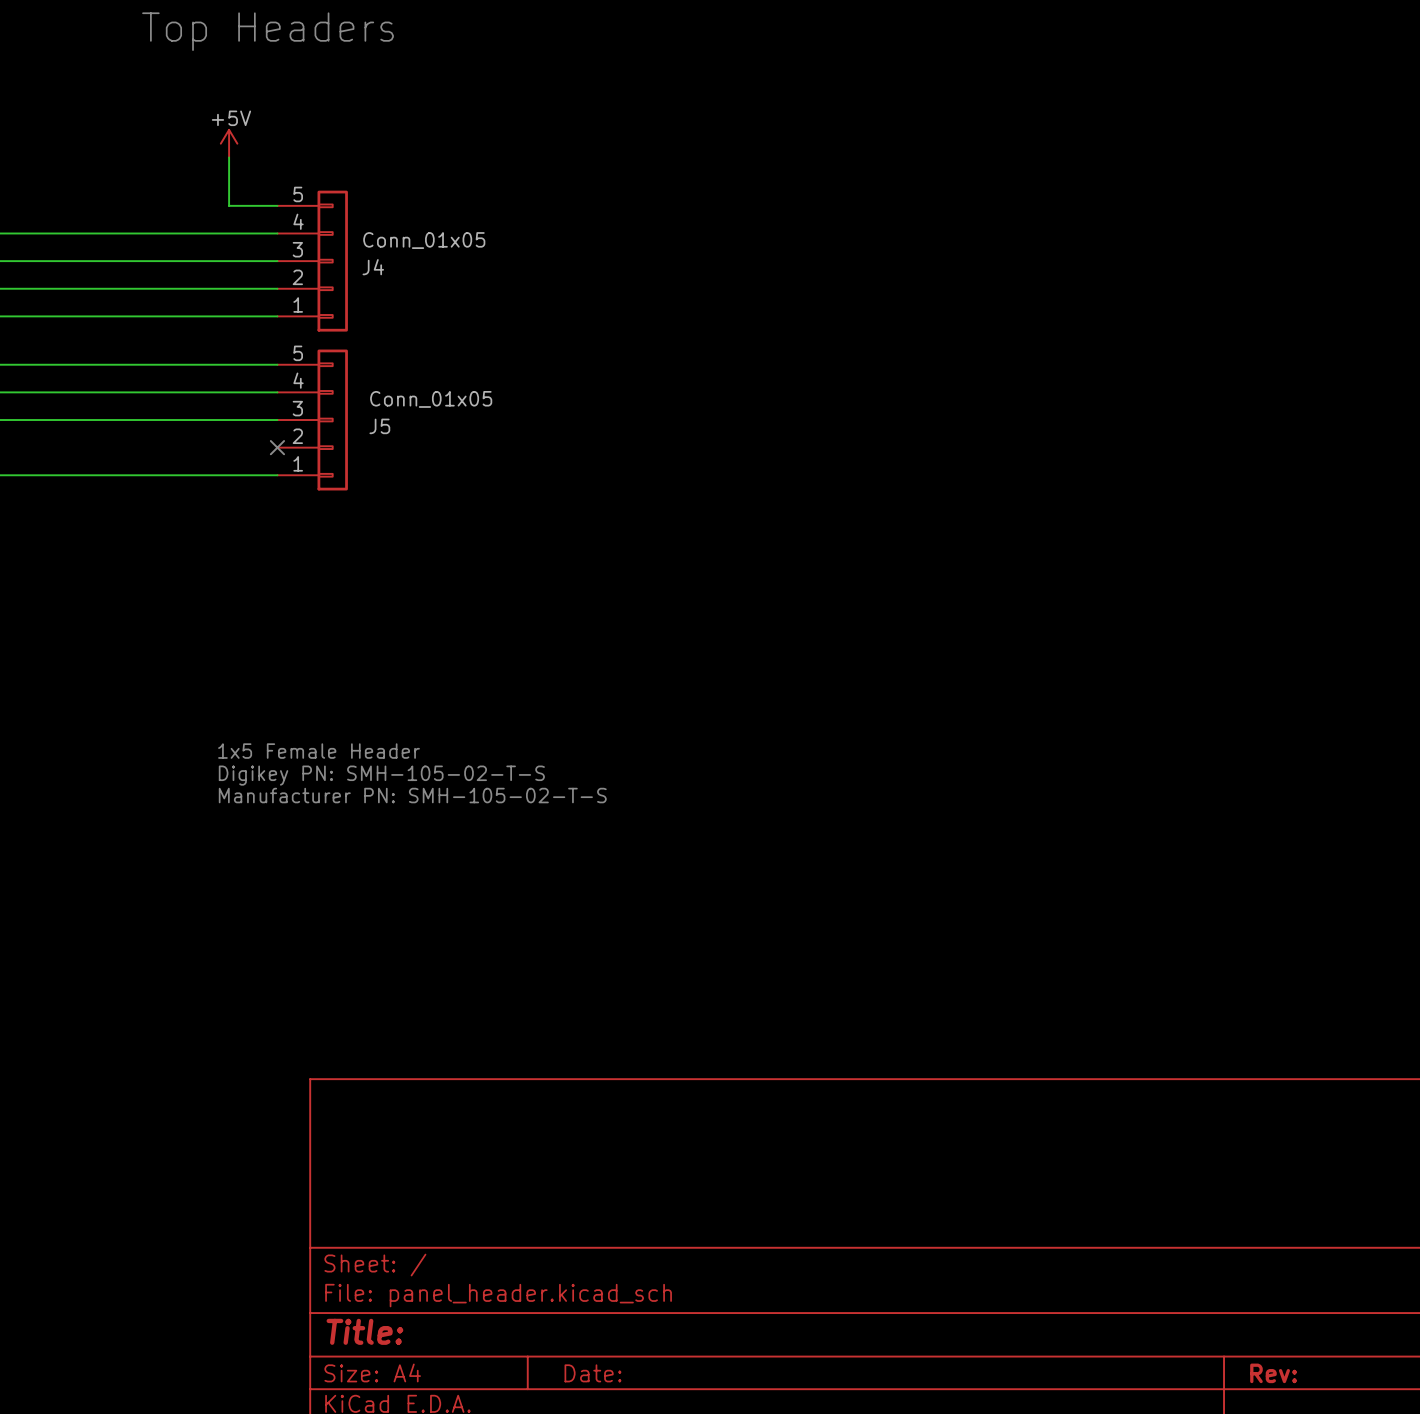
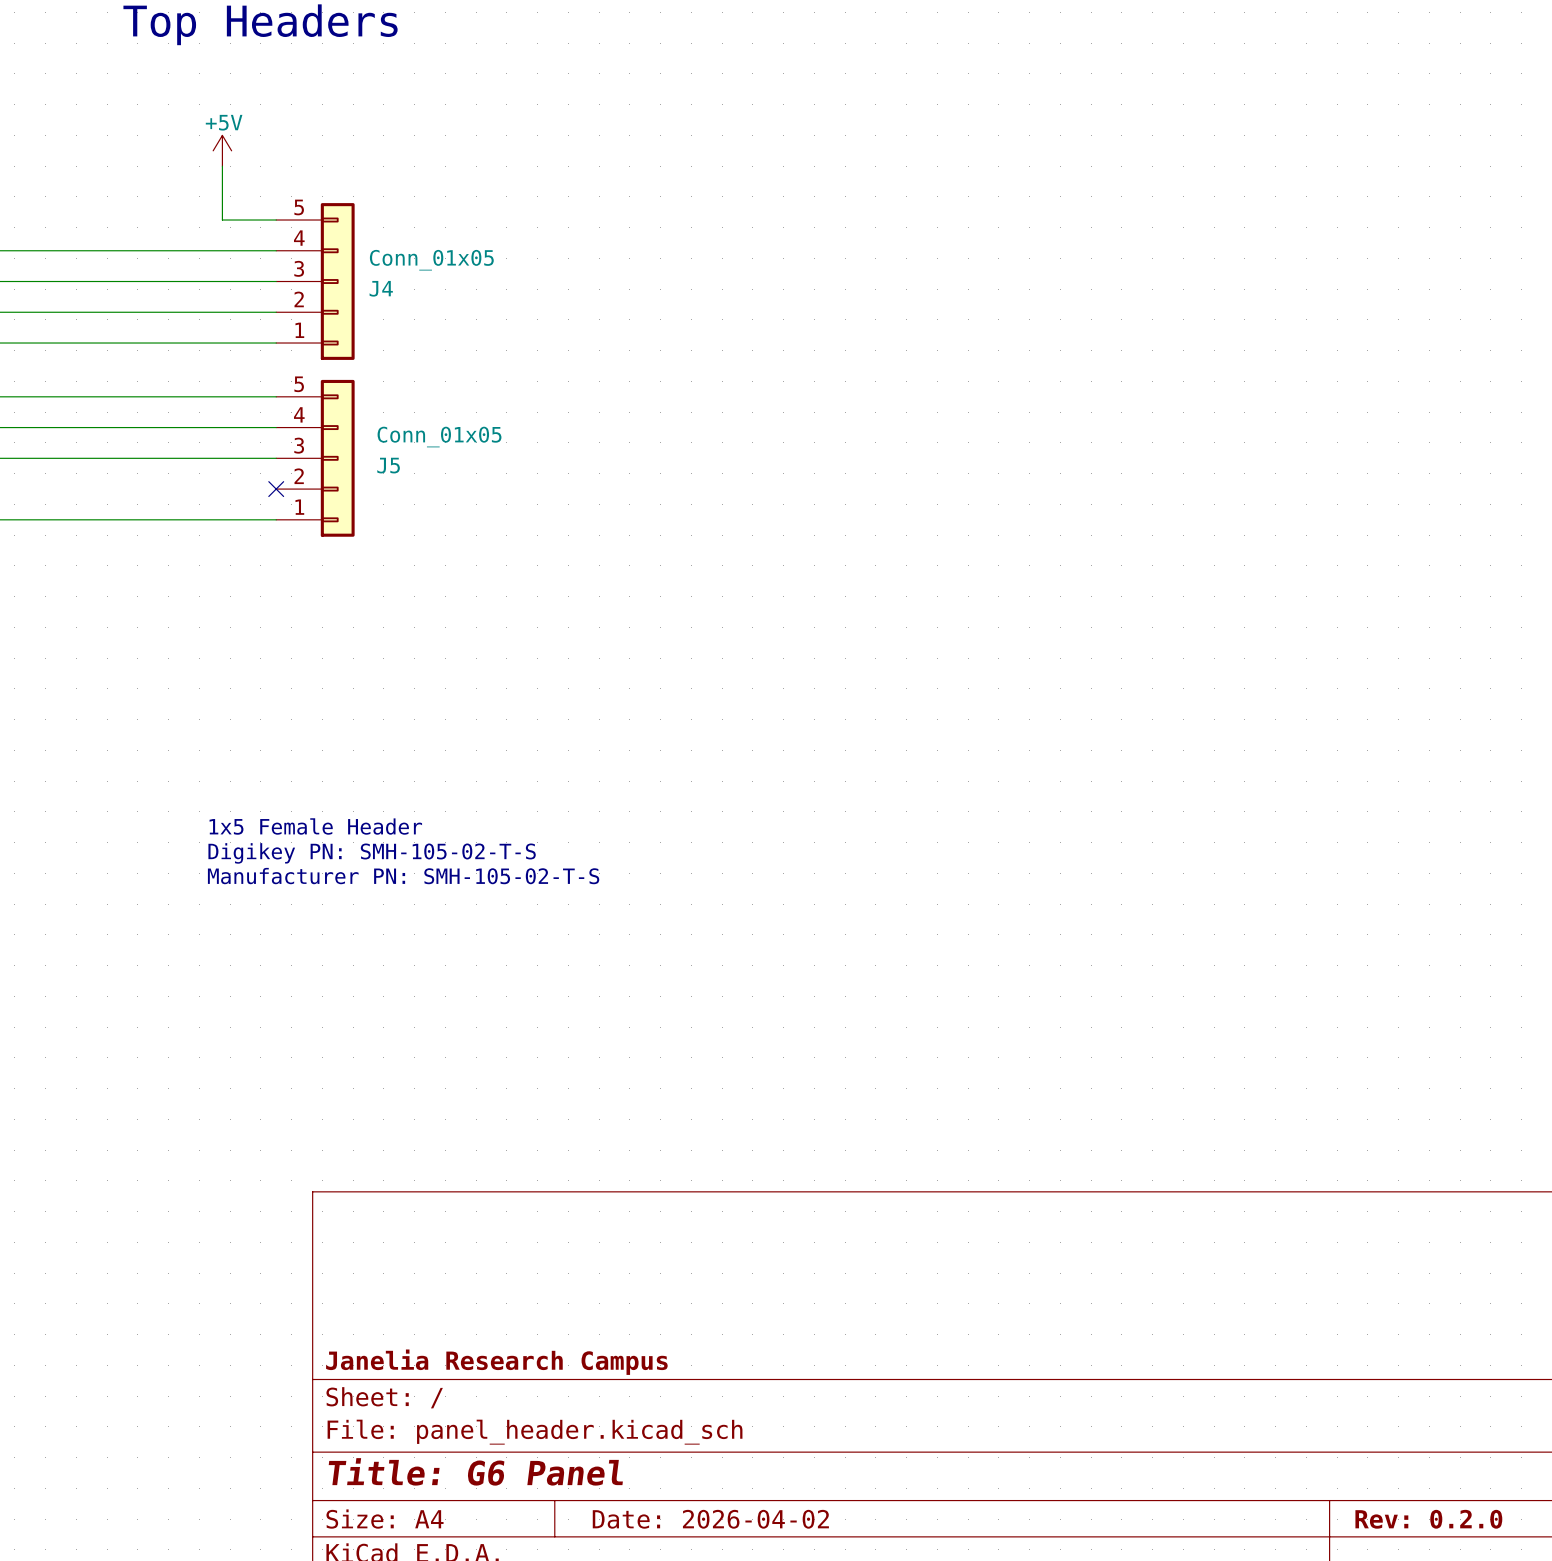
title block: none -> Janelia Research Campus (496, 1362)
title block: Title: (364, 1331) -> Title: G6 Panel (475, 1471)
title block: Date: (592, 1373) -> Date: 2026-04-02 (710, 1519)
title block: Rev: (1273, 1373) -> Rev: 0.2.0 (1428, 1519)

